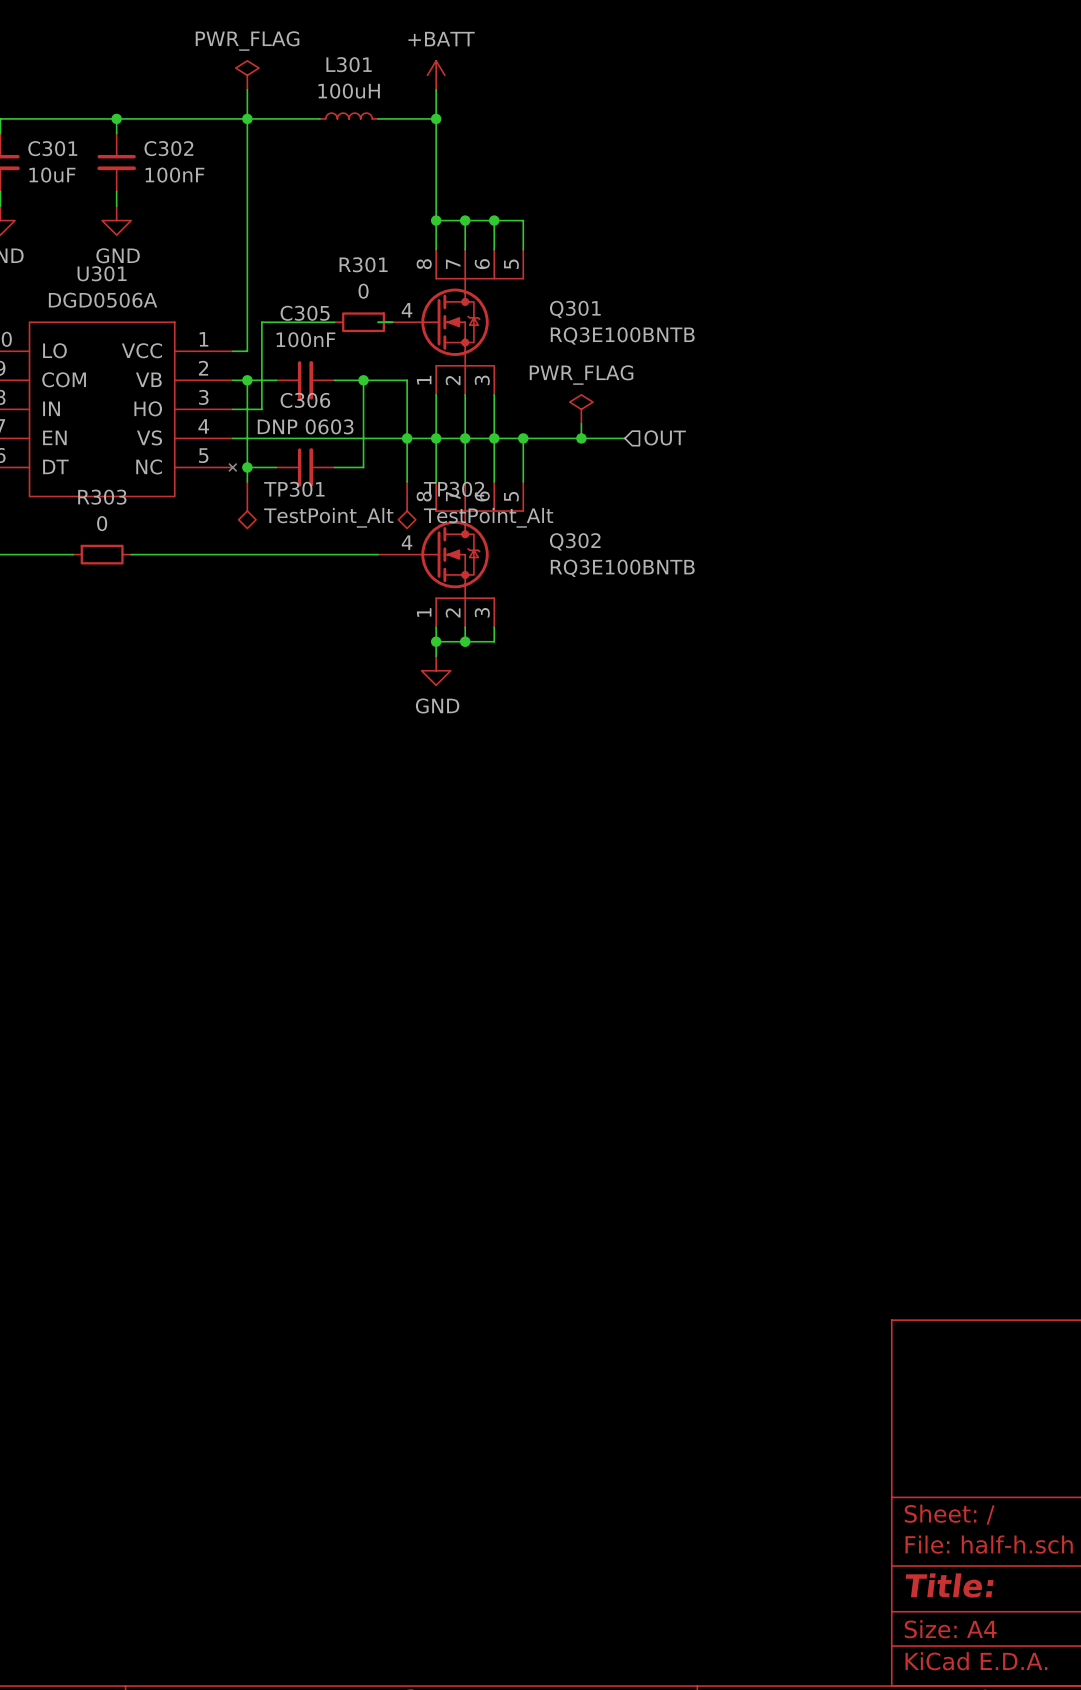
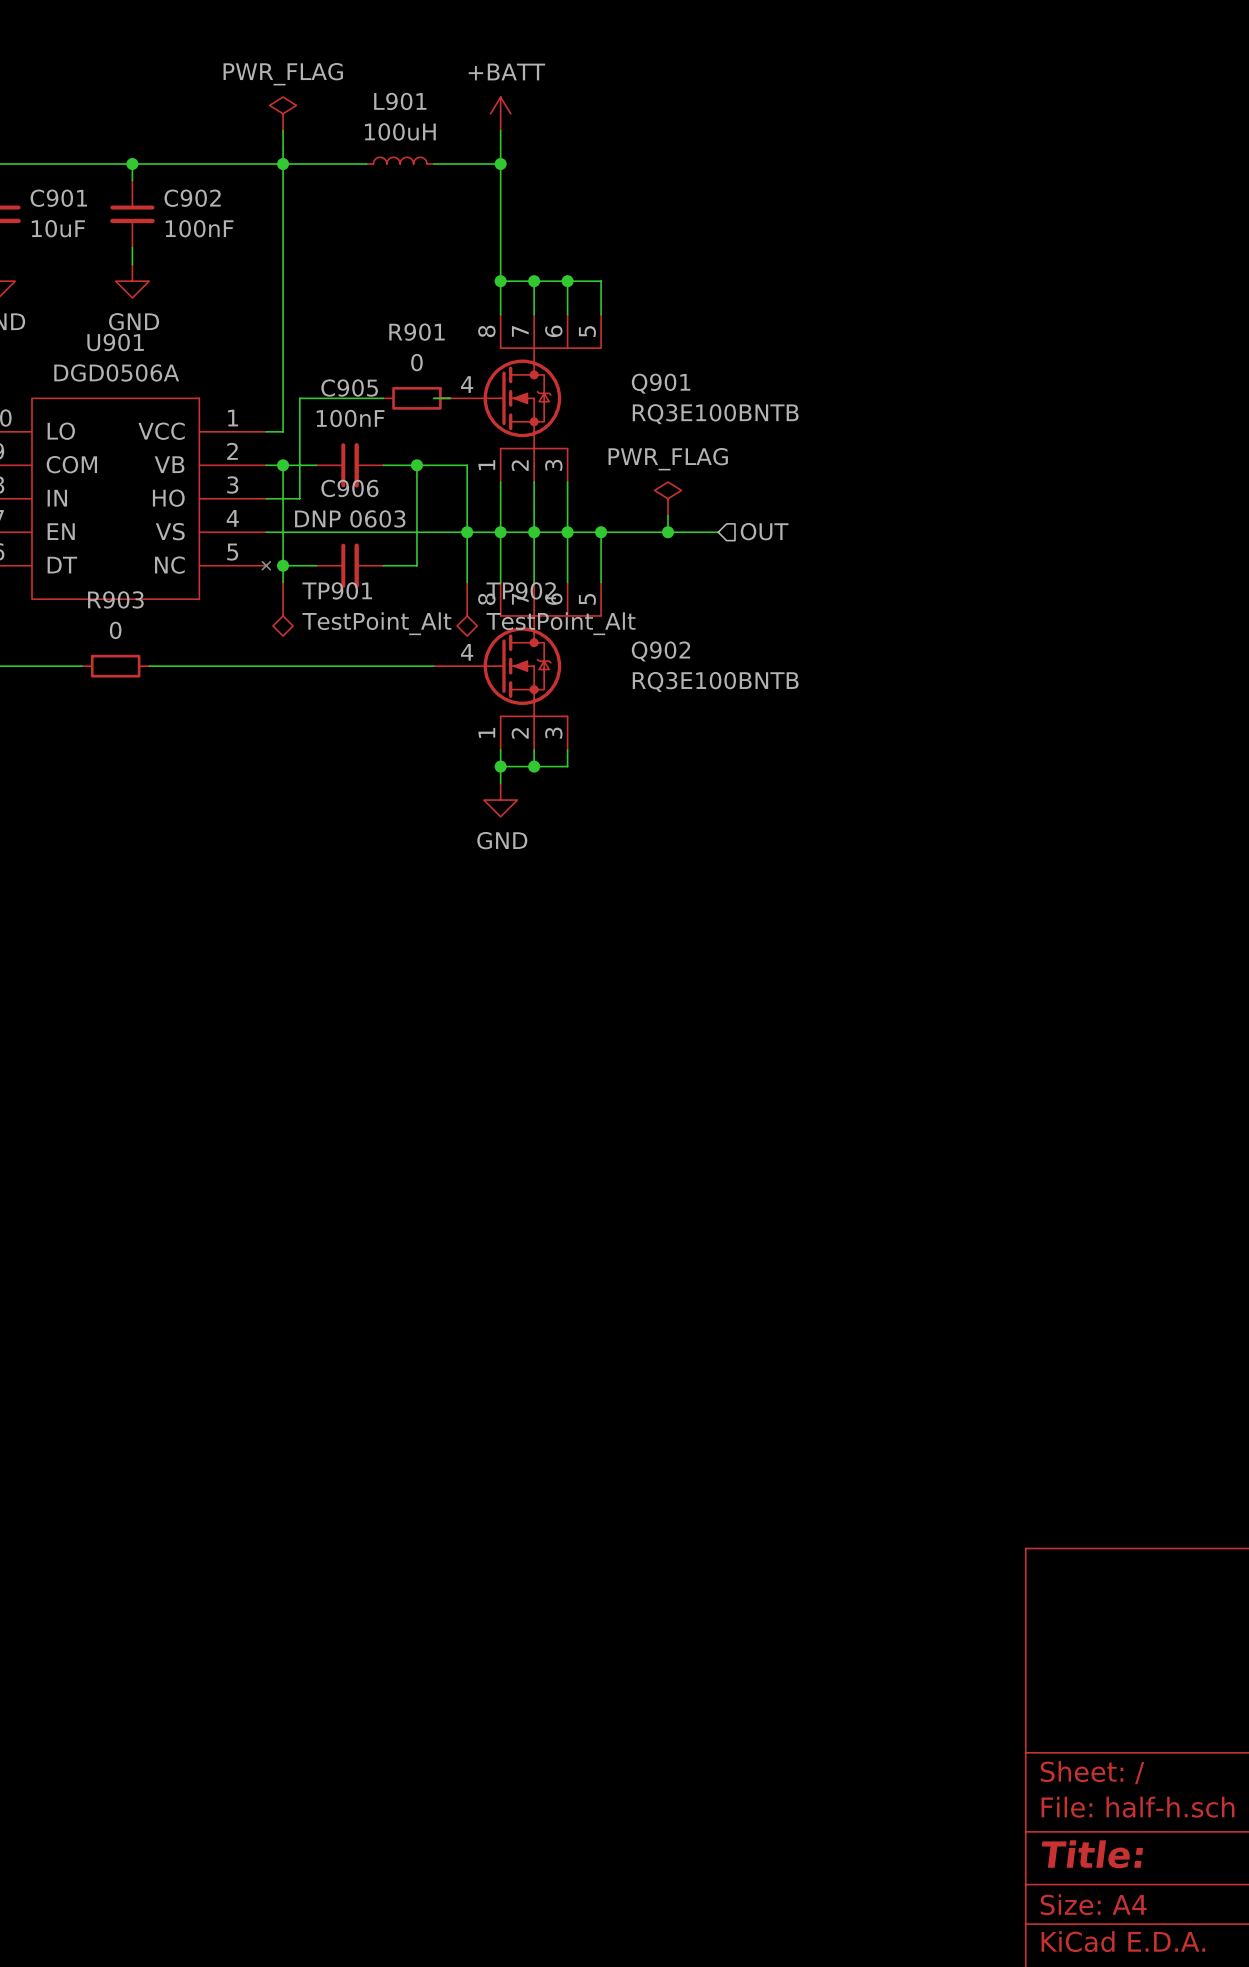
L301 name: L301 (349, 64) -> L901 (400, 101)
C301 name: C301 (52, 148) -> C901 (58, 198)
C302 name: C302 (168, 148) -> C902 (192, 198)
R301 name: R301 (363, 264) -> R901 (417, 332)
U301 name: U301 (102, 273) -> U901 (115, 342)
Q301 name: Q301 (575, 309) -> Q901 (661, 383)
C305 name: C305 (305, 313) -> C905 (349, 388)
C306 name: C306 (305, 400) -> C906 (349, 488)
TP301 name: TP301 (294, 489) -> TP901 (337, 590)
TP302 name: TP302 (454, 489) -> TP902 (521, 590)
R303 name: R303 (102, 497) -> R903 (115, 599)
Q302 name: Q302 (575, 541) -> Q902 (660, 651)

